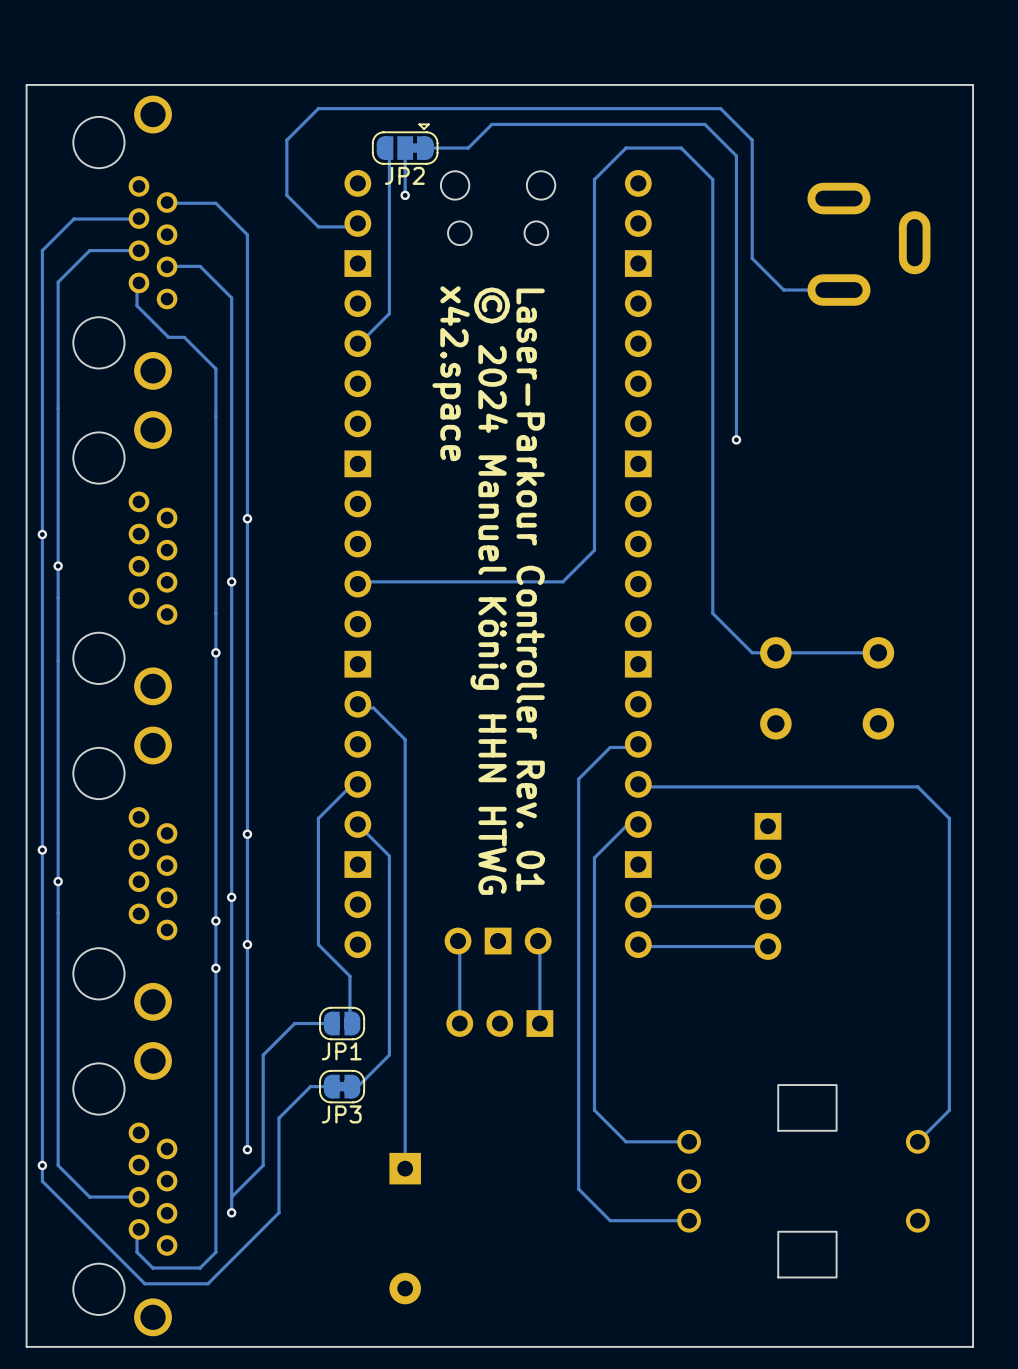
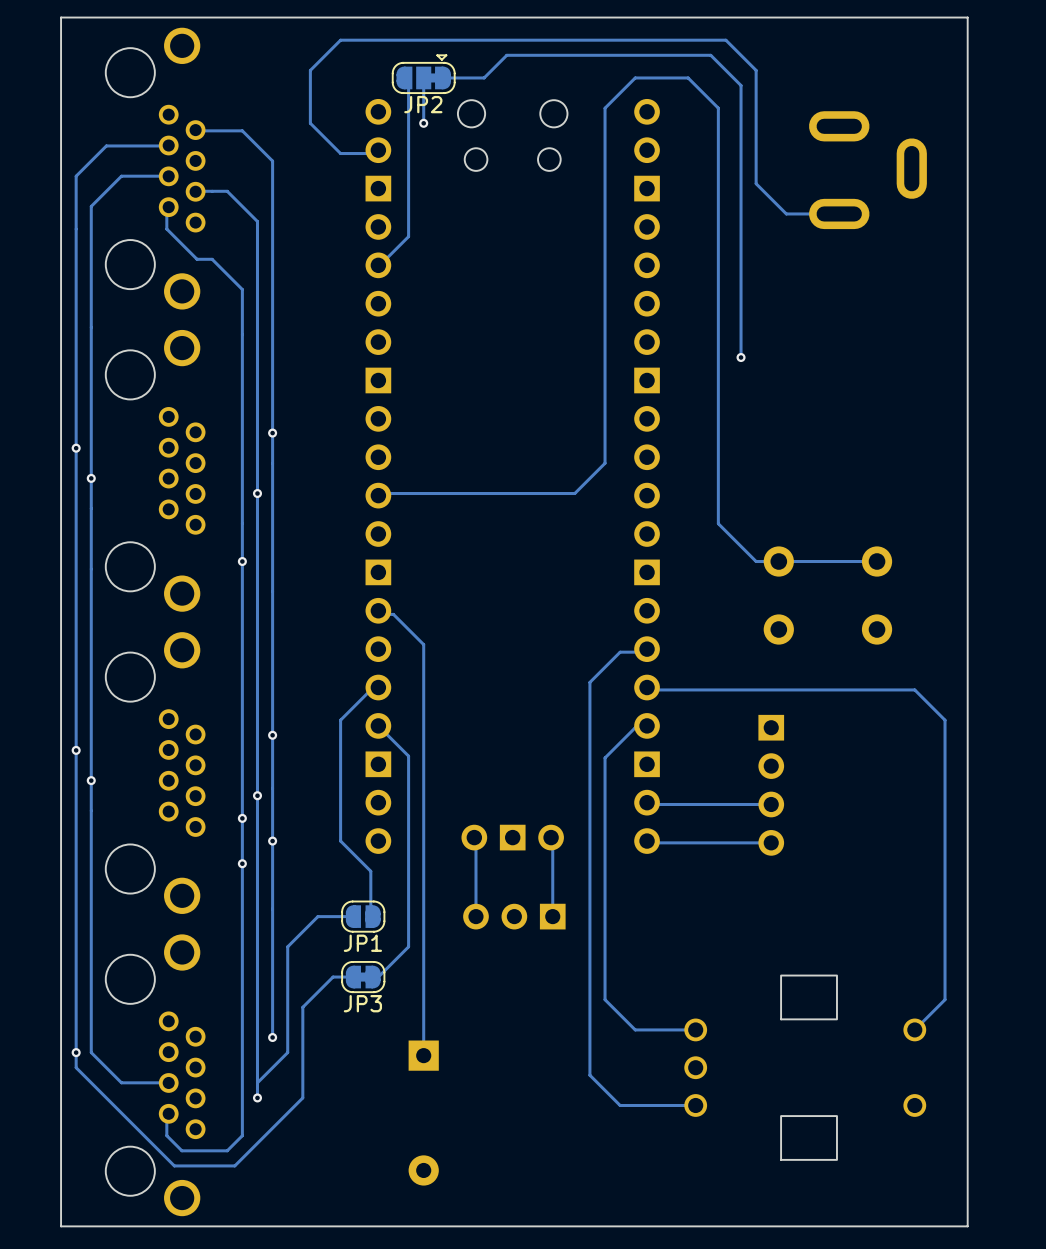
text: x42.space (451, 373) -> none
text: Laser-Parkour Controller Rev. 01 (530, 590) -> none
text: © 2024 Manuel König HHN HTWG (490, 591) -> none

